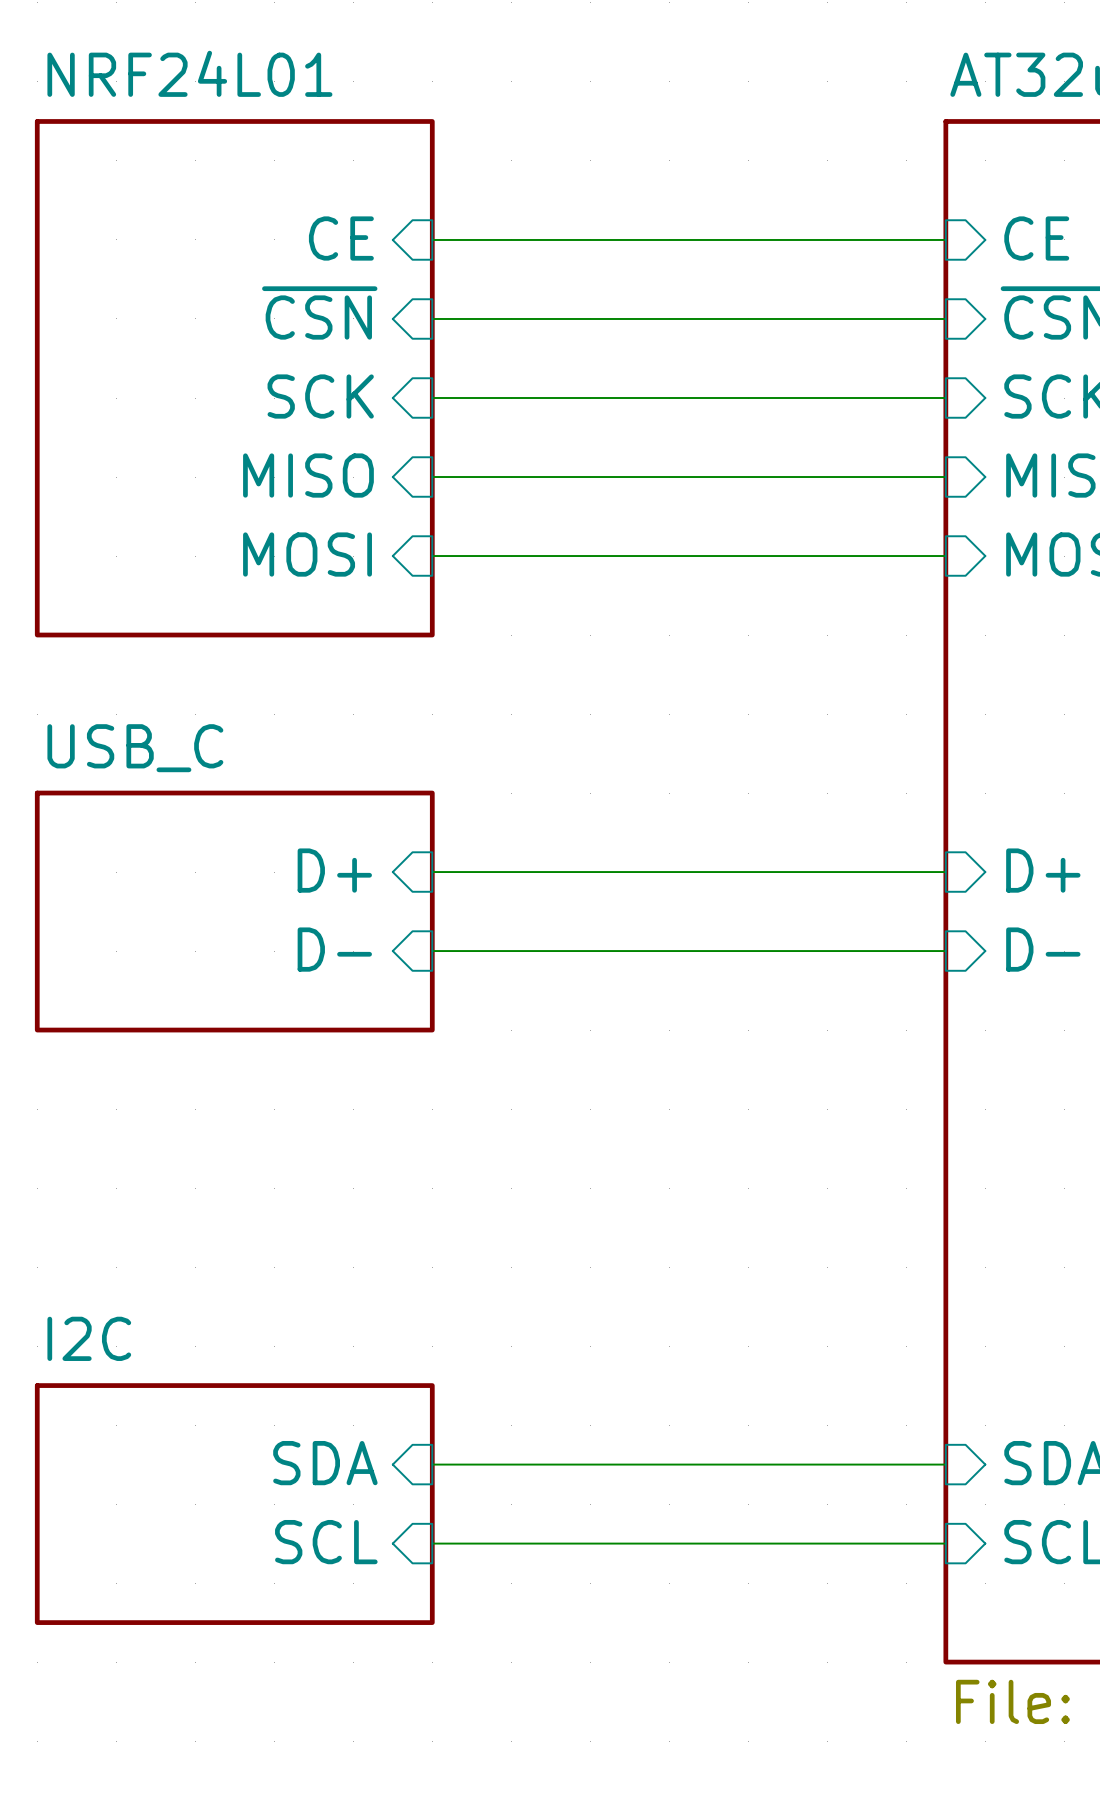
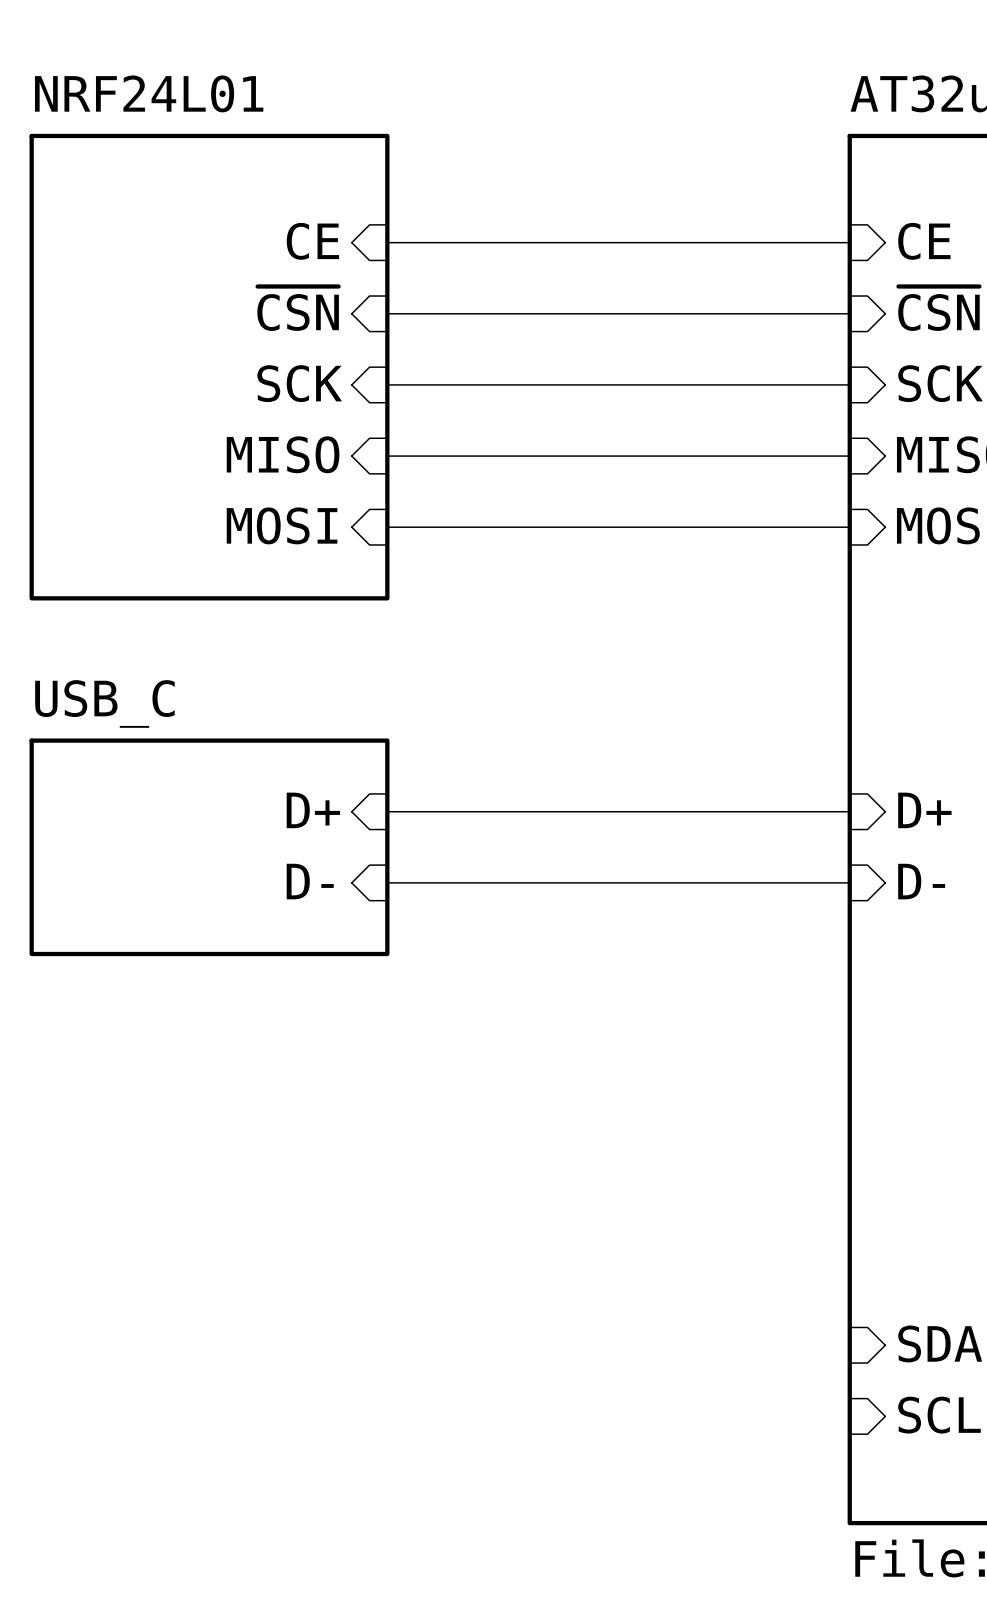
sheet pin: SDA (325, 1463) -> none
wire: (432, 1464) (945, 1464) -> none
sheet I2C: (234, 1504) -> none
sheet pin: SCL (326, 1542) -> none
wire: (432, 1543) (945, 1543) -> none

